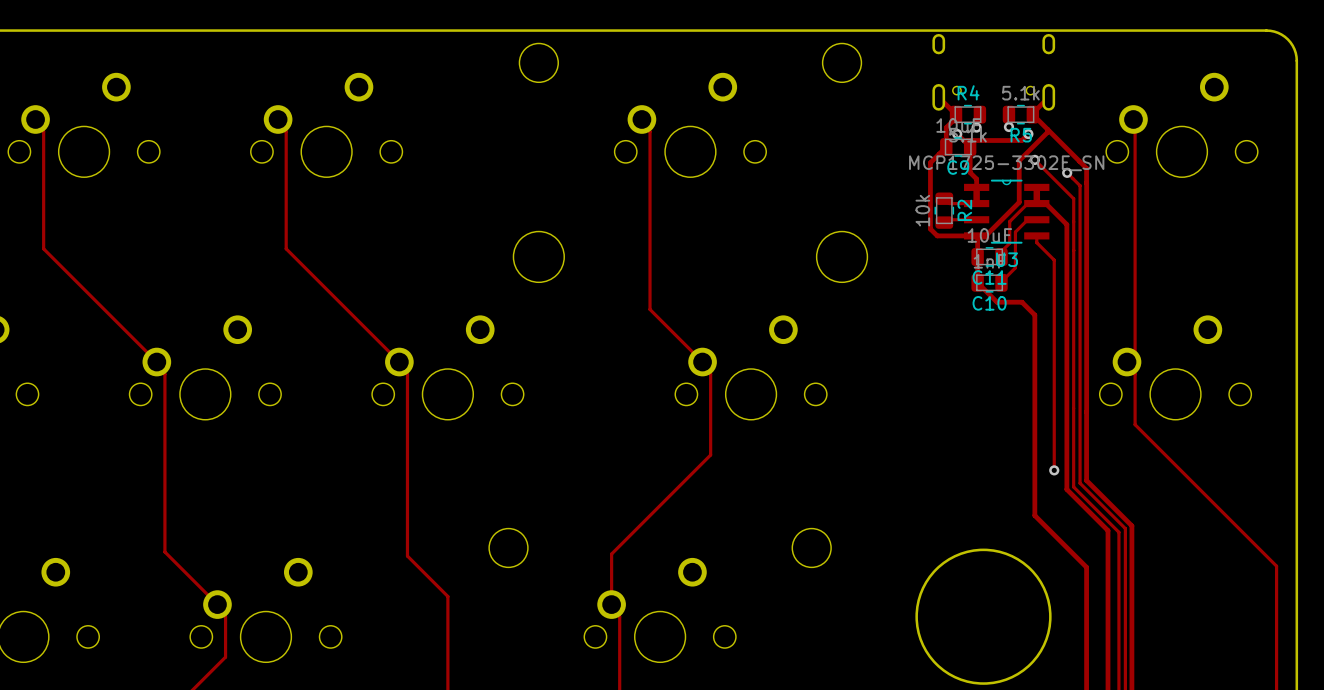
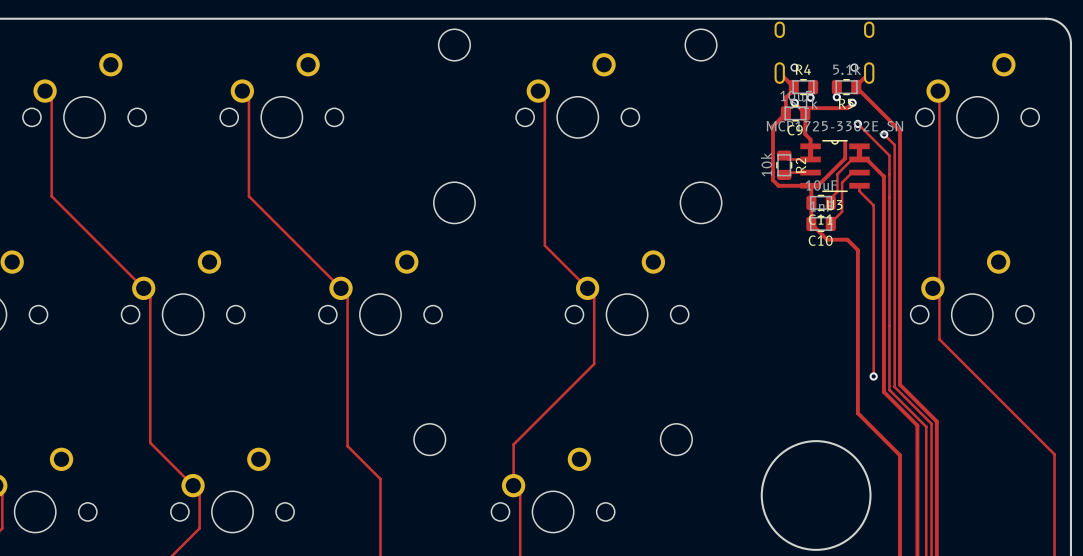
track: (1047, 129) (1047, 132) (1019, 160) (1019, 183) -> none

